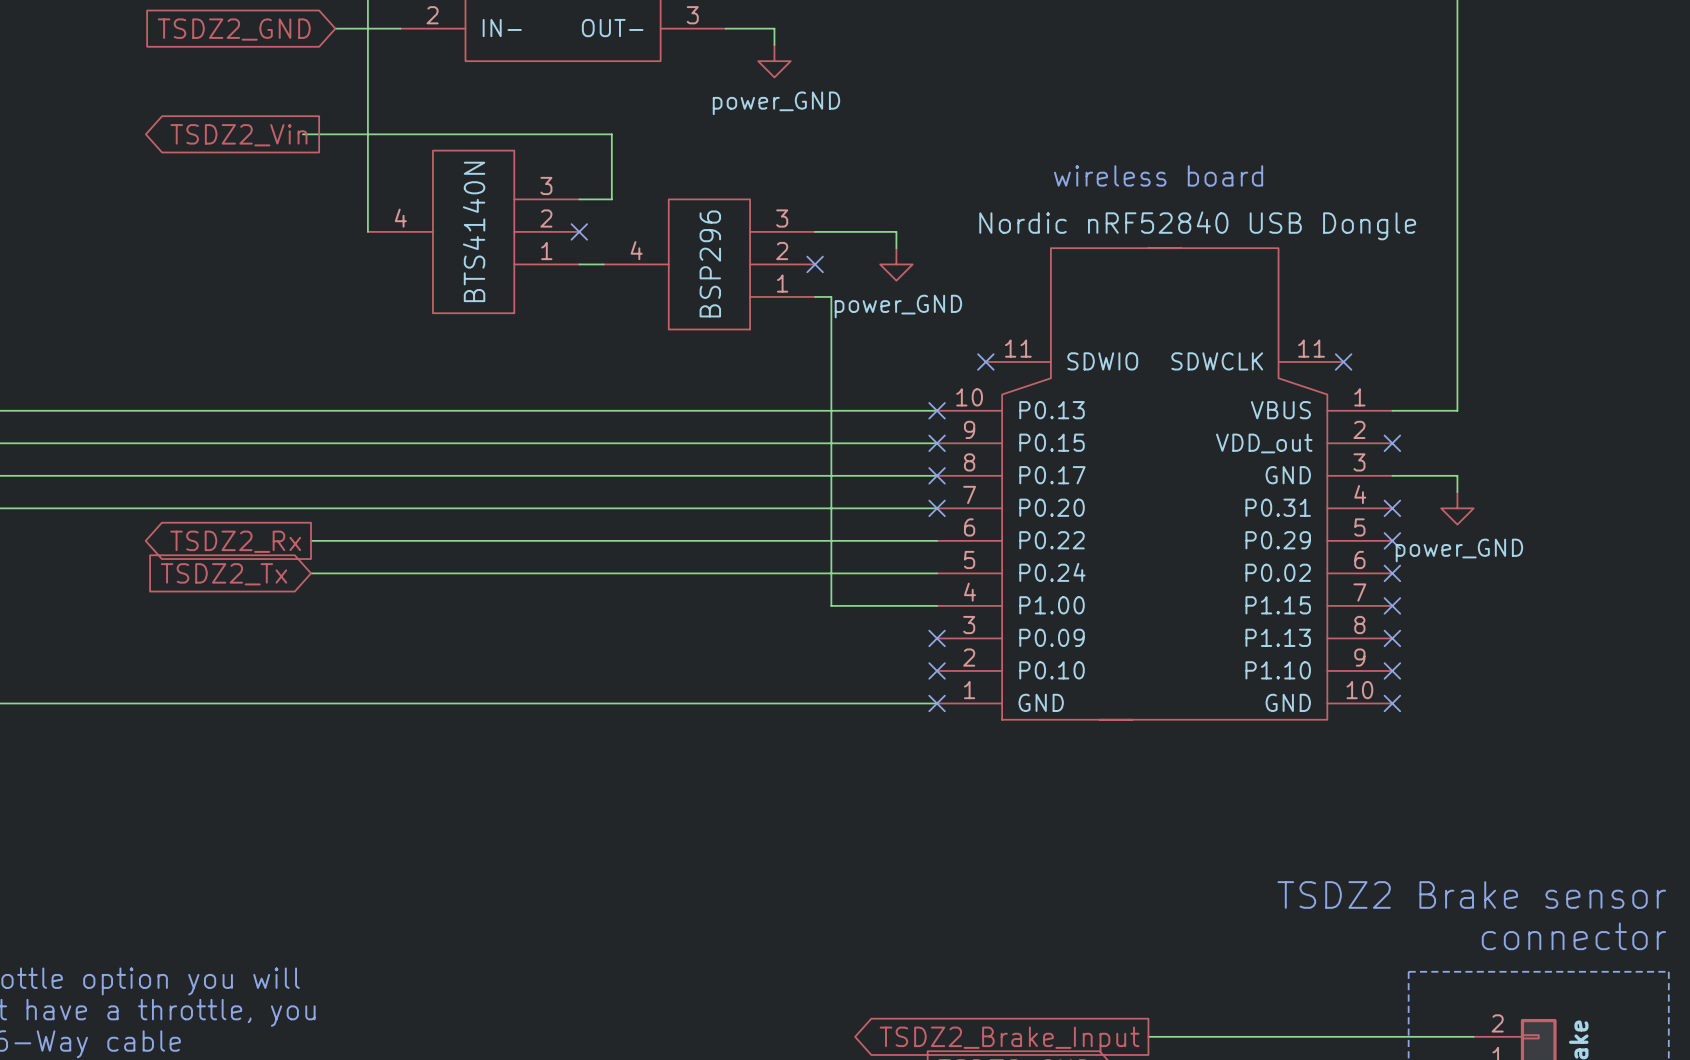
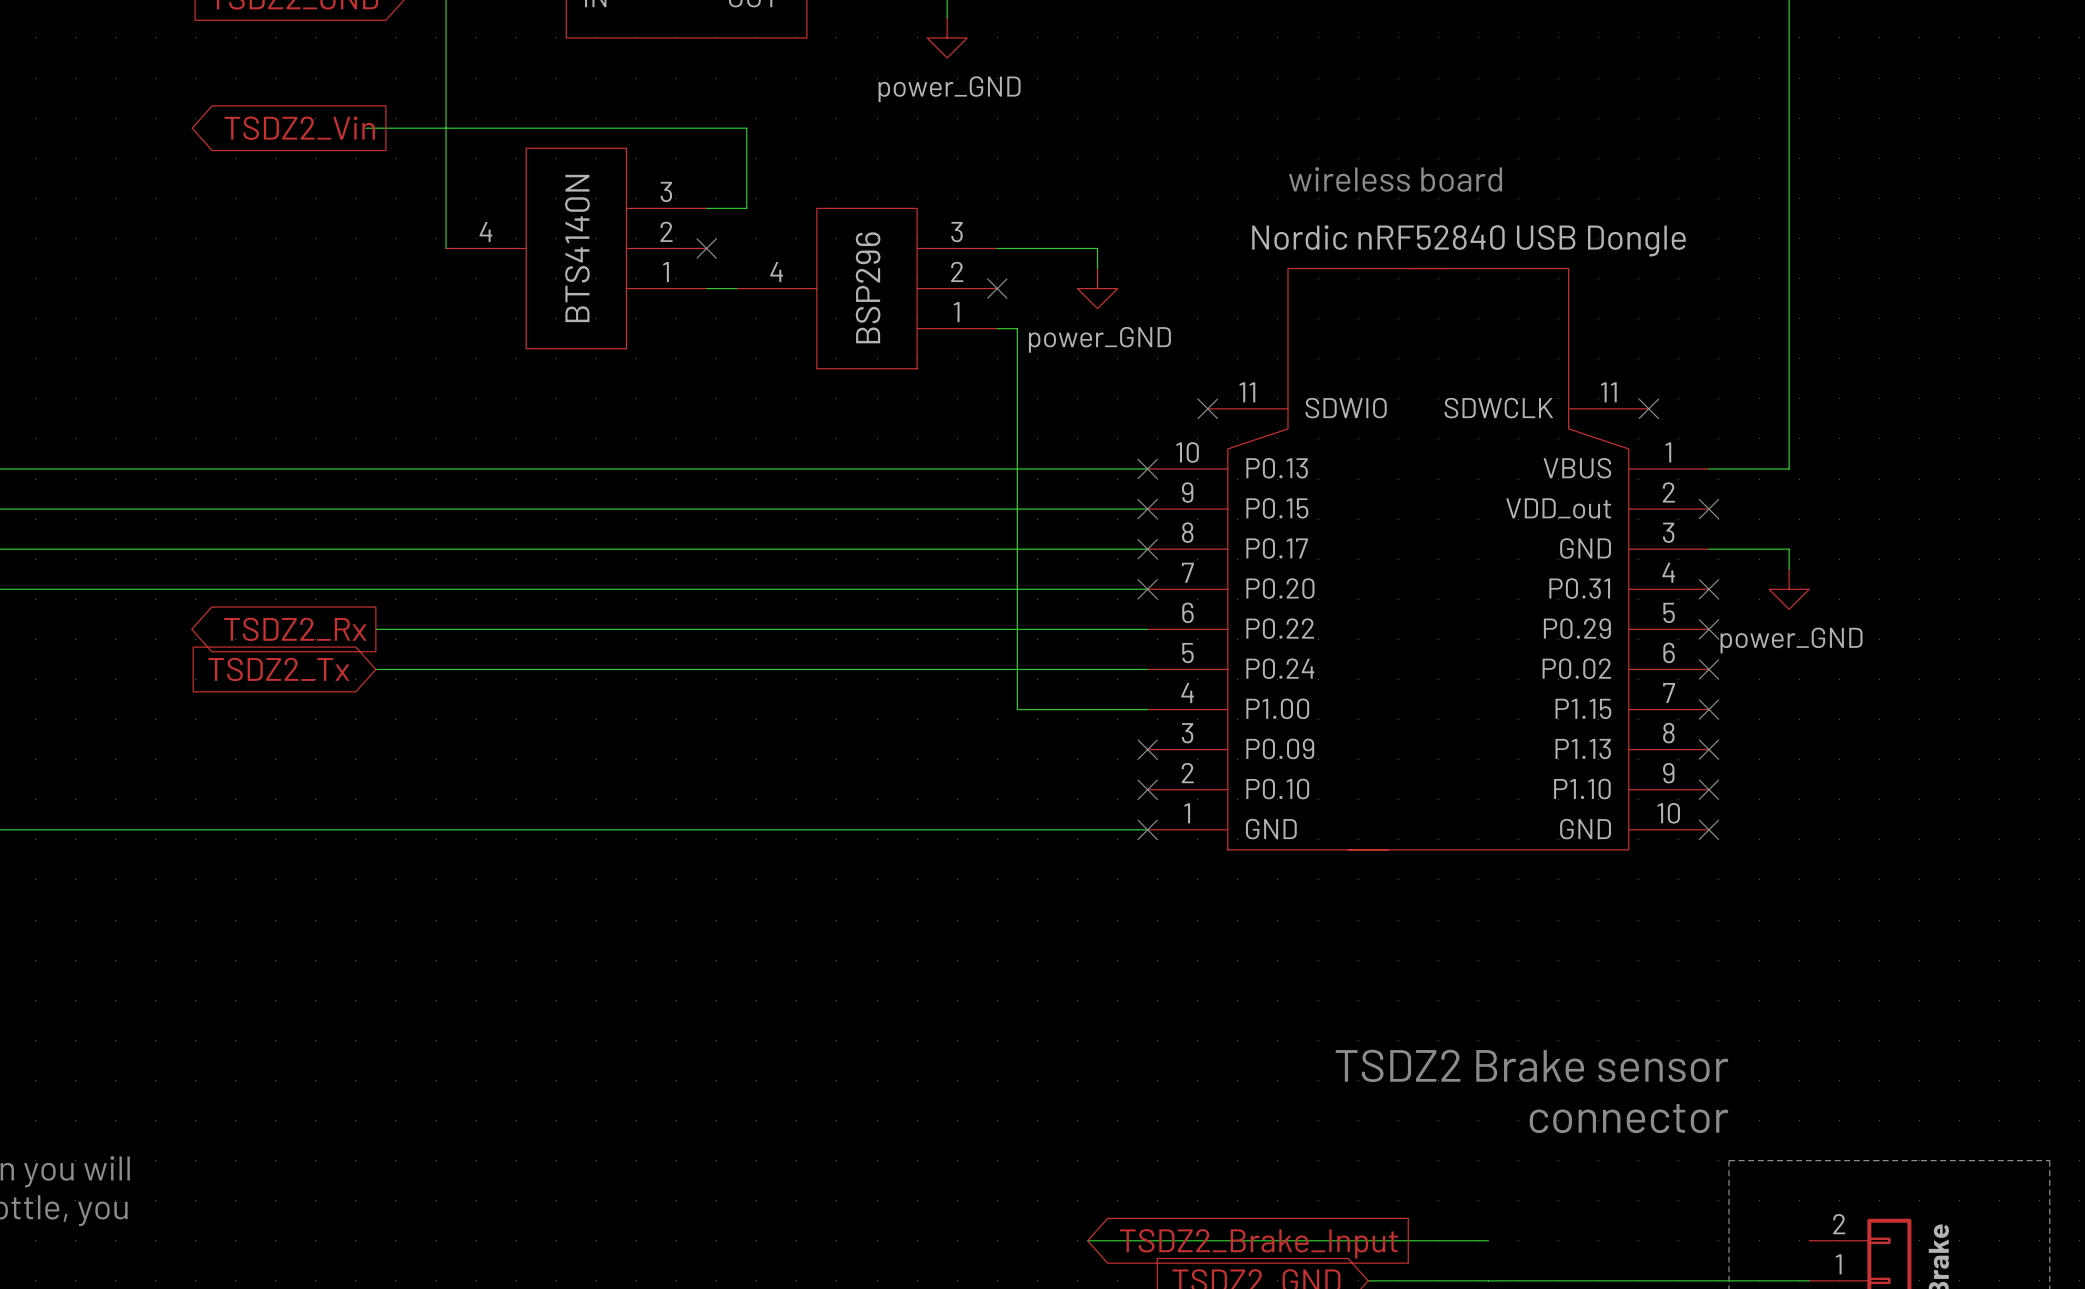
text position: TSDZ2 Brake sensor (1471, 894) -> TSDZ2 Brake sensor (1532, 1065)
text: none -> connector (1629, 1118)
text: connector (1573, 936) -> none
wire: none -> (1087, 1240) (1408, 1240)
wire: (1213, 1036) (1473, 1036) -> none

